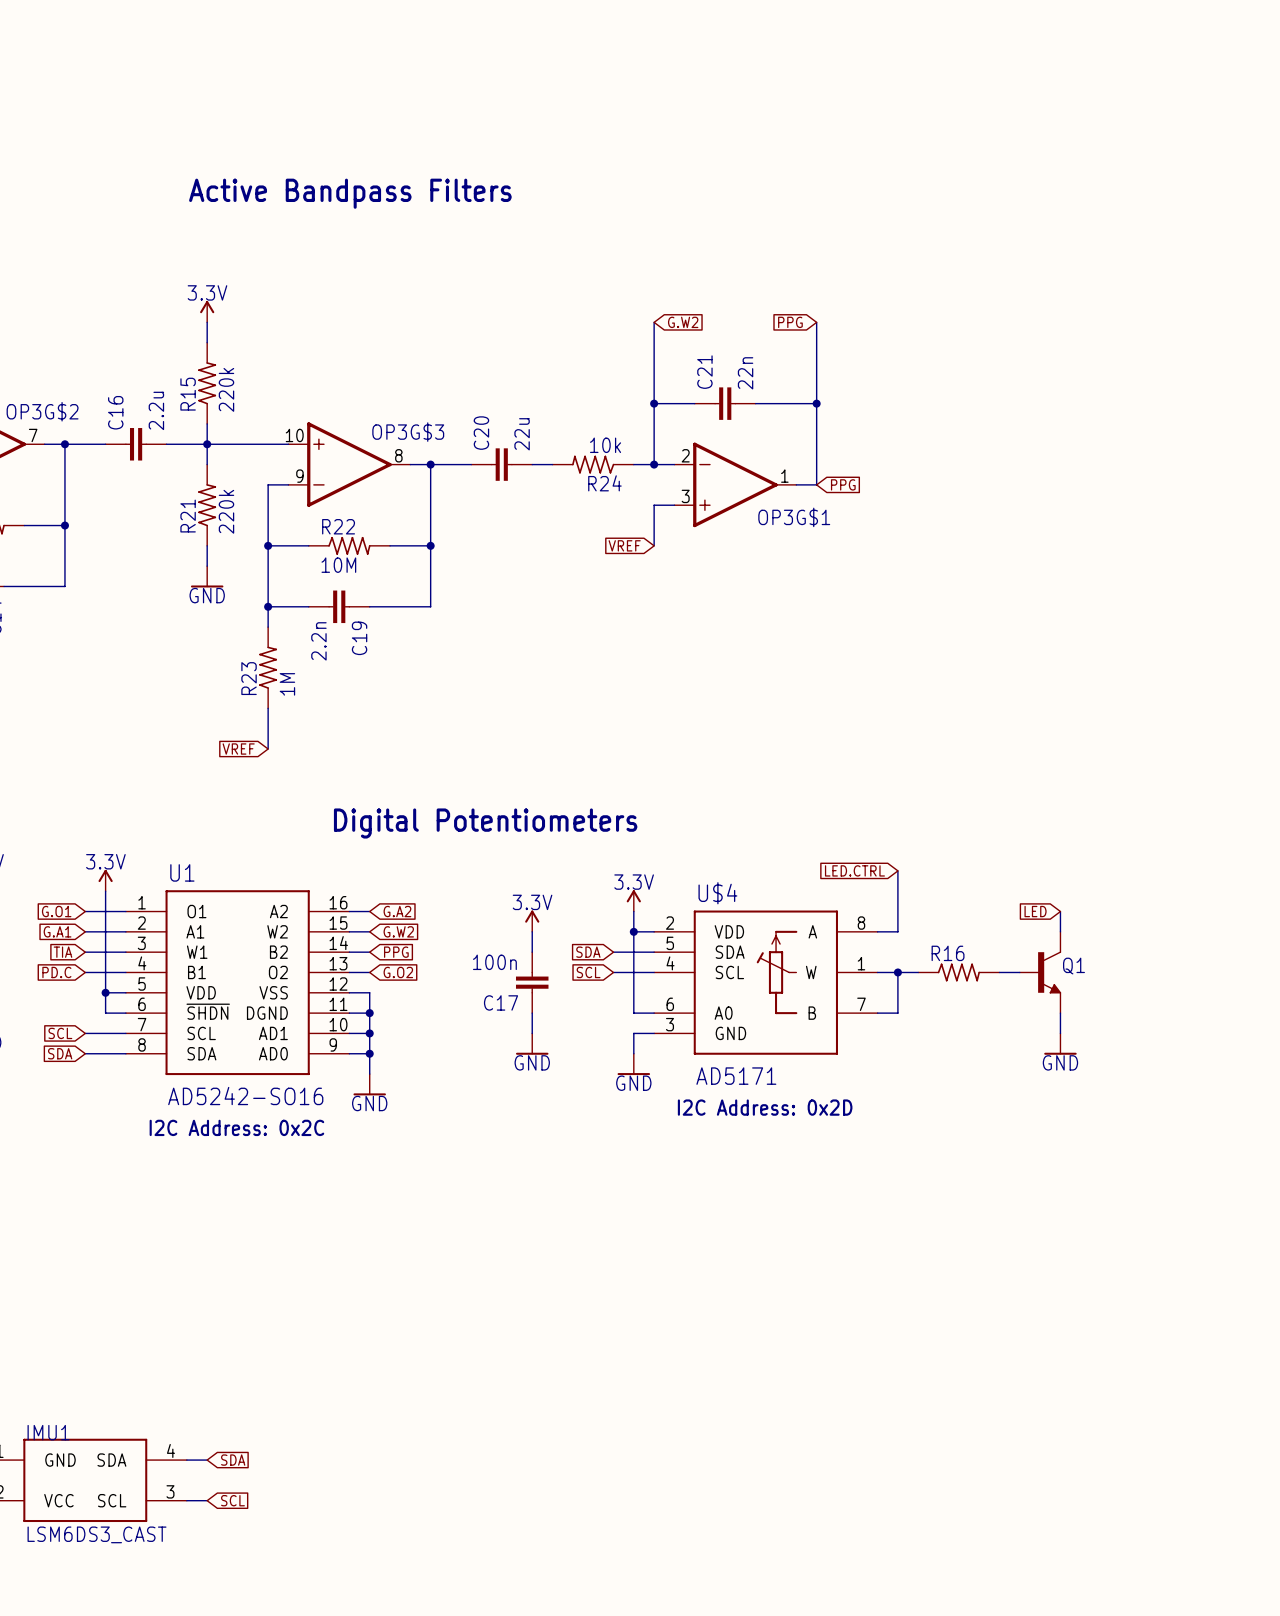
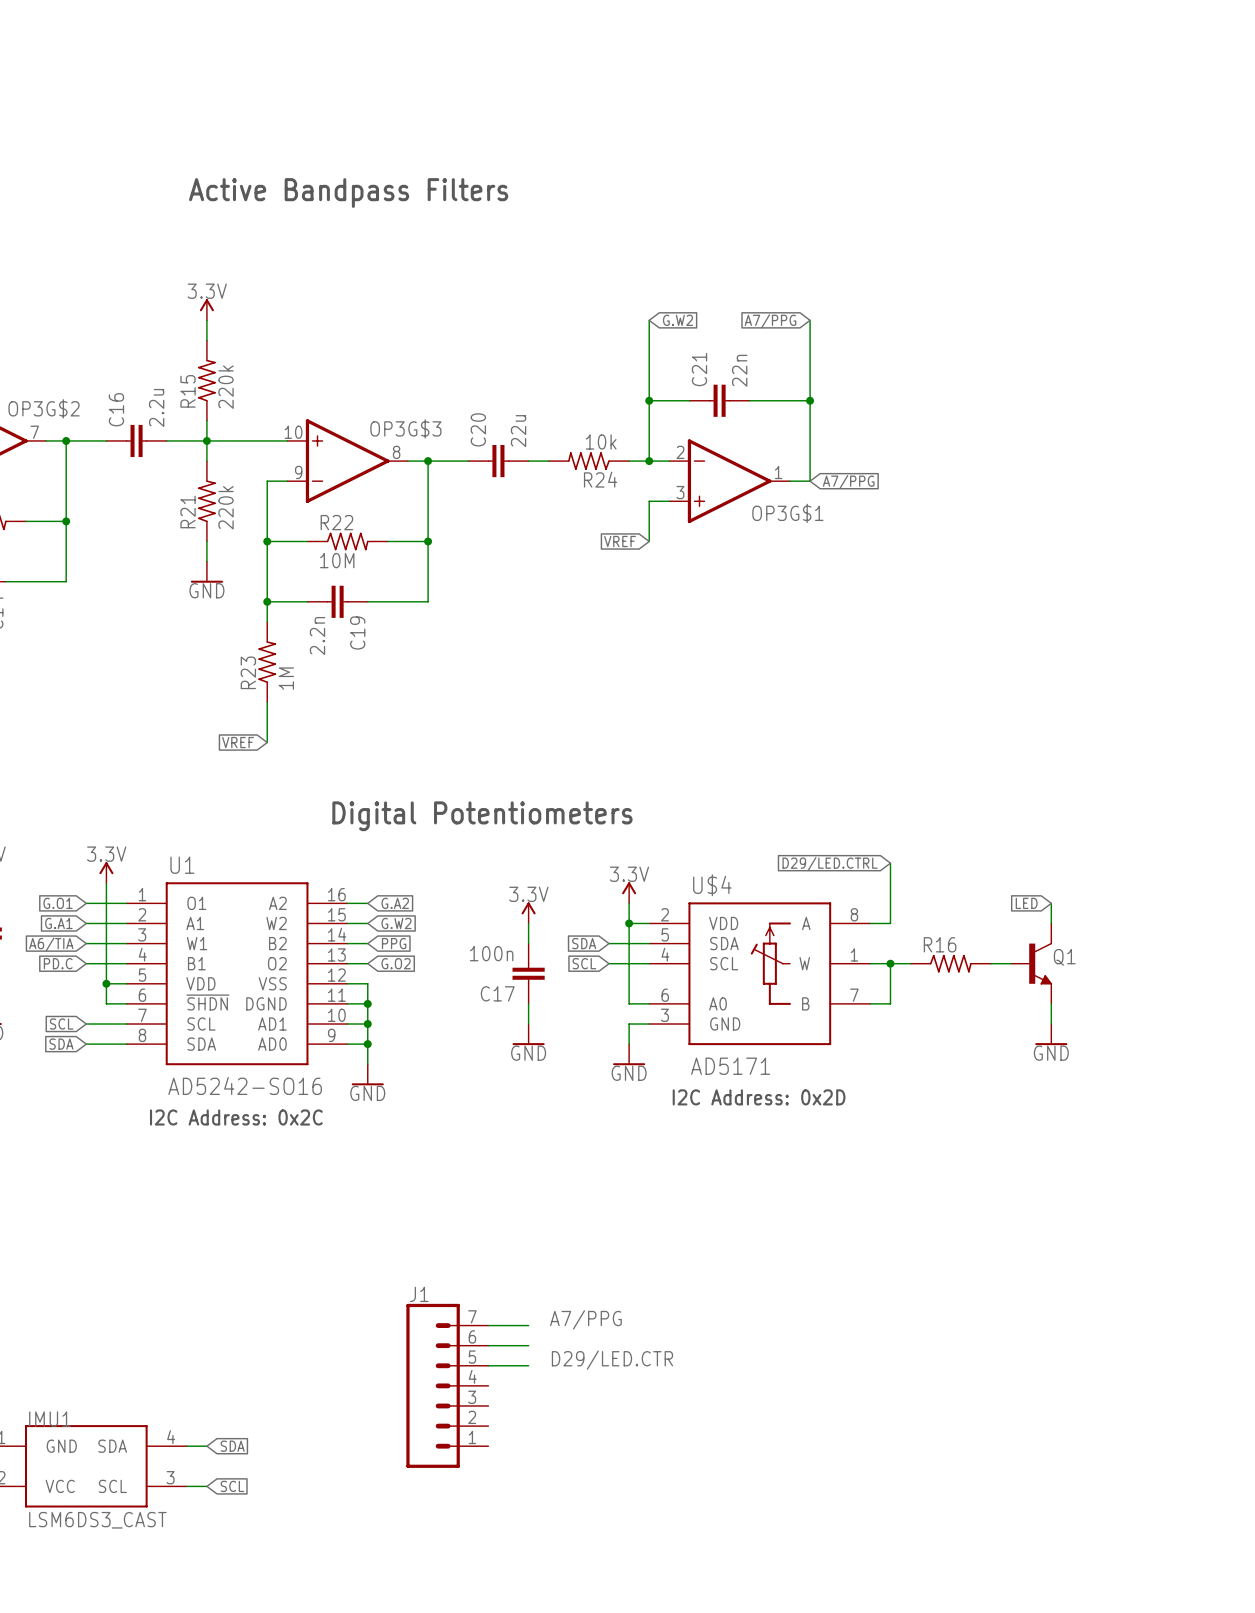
global label: PPG (790, 322) -> A7/PPG (770, 321)
global label: PPG (843, 484) -> A7/PPG (848, 482)
global label: LED.CTRL (854, 870) -> D29/LED.CTRL (830, 864)
global label: TIA (62, 952) -> A6/TIA (51, 944)
label: none -> A7/PPG (585, 1319)
wire: none -> (488, 1325) (528, 1325)
wire: none -> (488, 1345) (528, 1345)
label: none -> D29/LED.CTR (612, 1360)
wire: none -> (488, 1365) (528, 1365)
J1: none -> (447, 1385)

